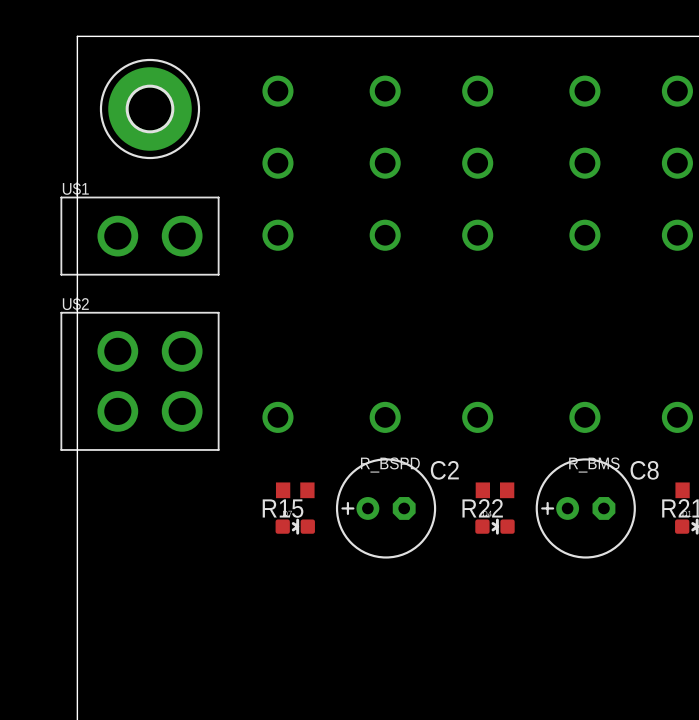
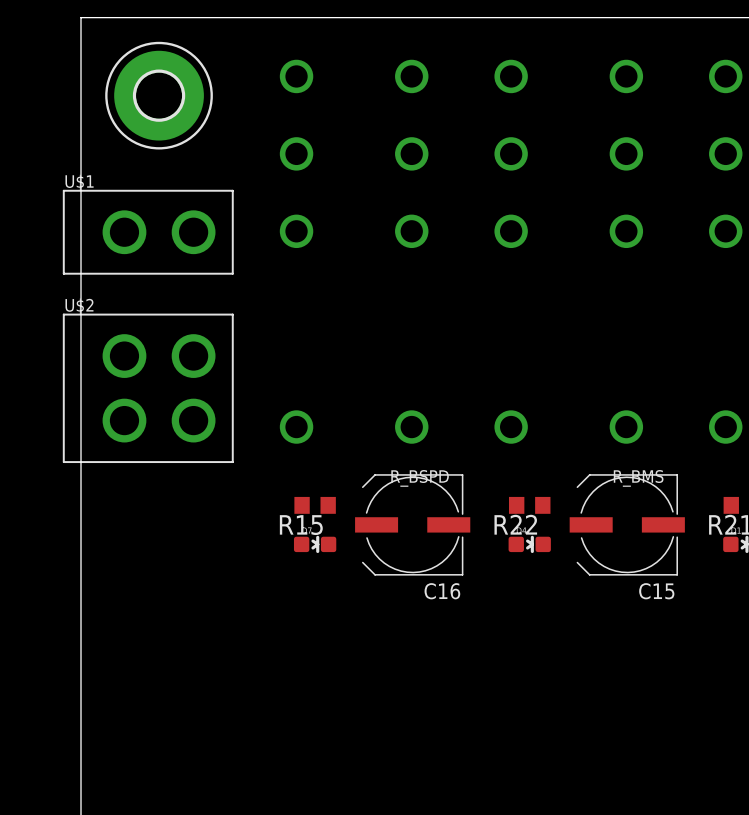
C2: (386, 508) -> none
C16: none -> (412, 524)
C8: (585, 508) -> none
C15: none -> (627, 524)

